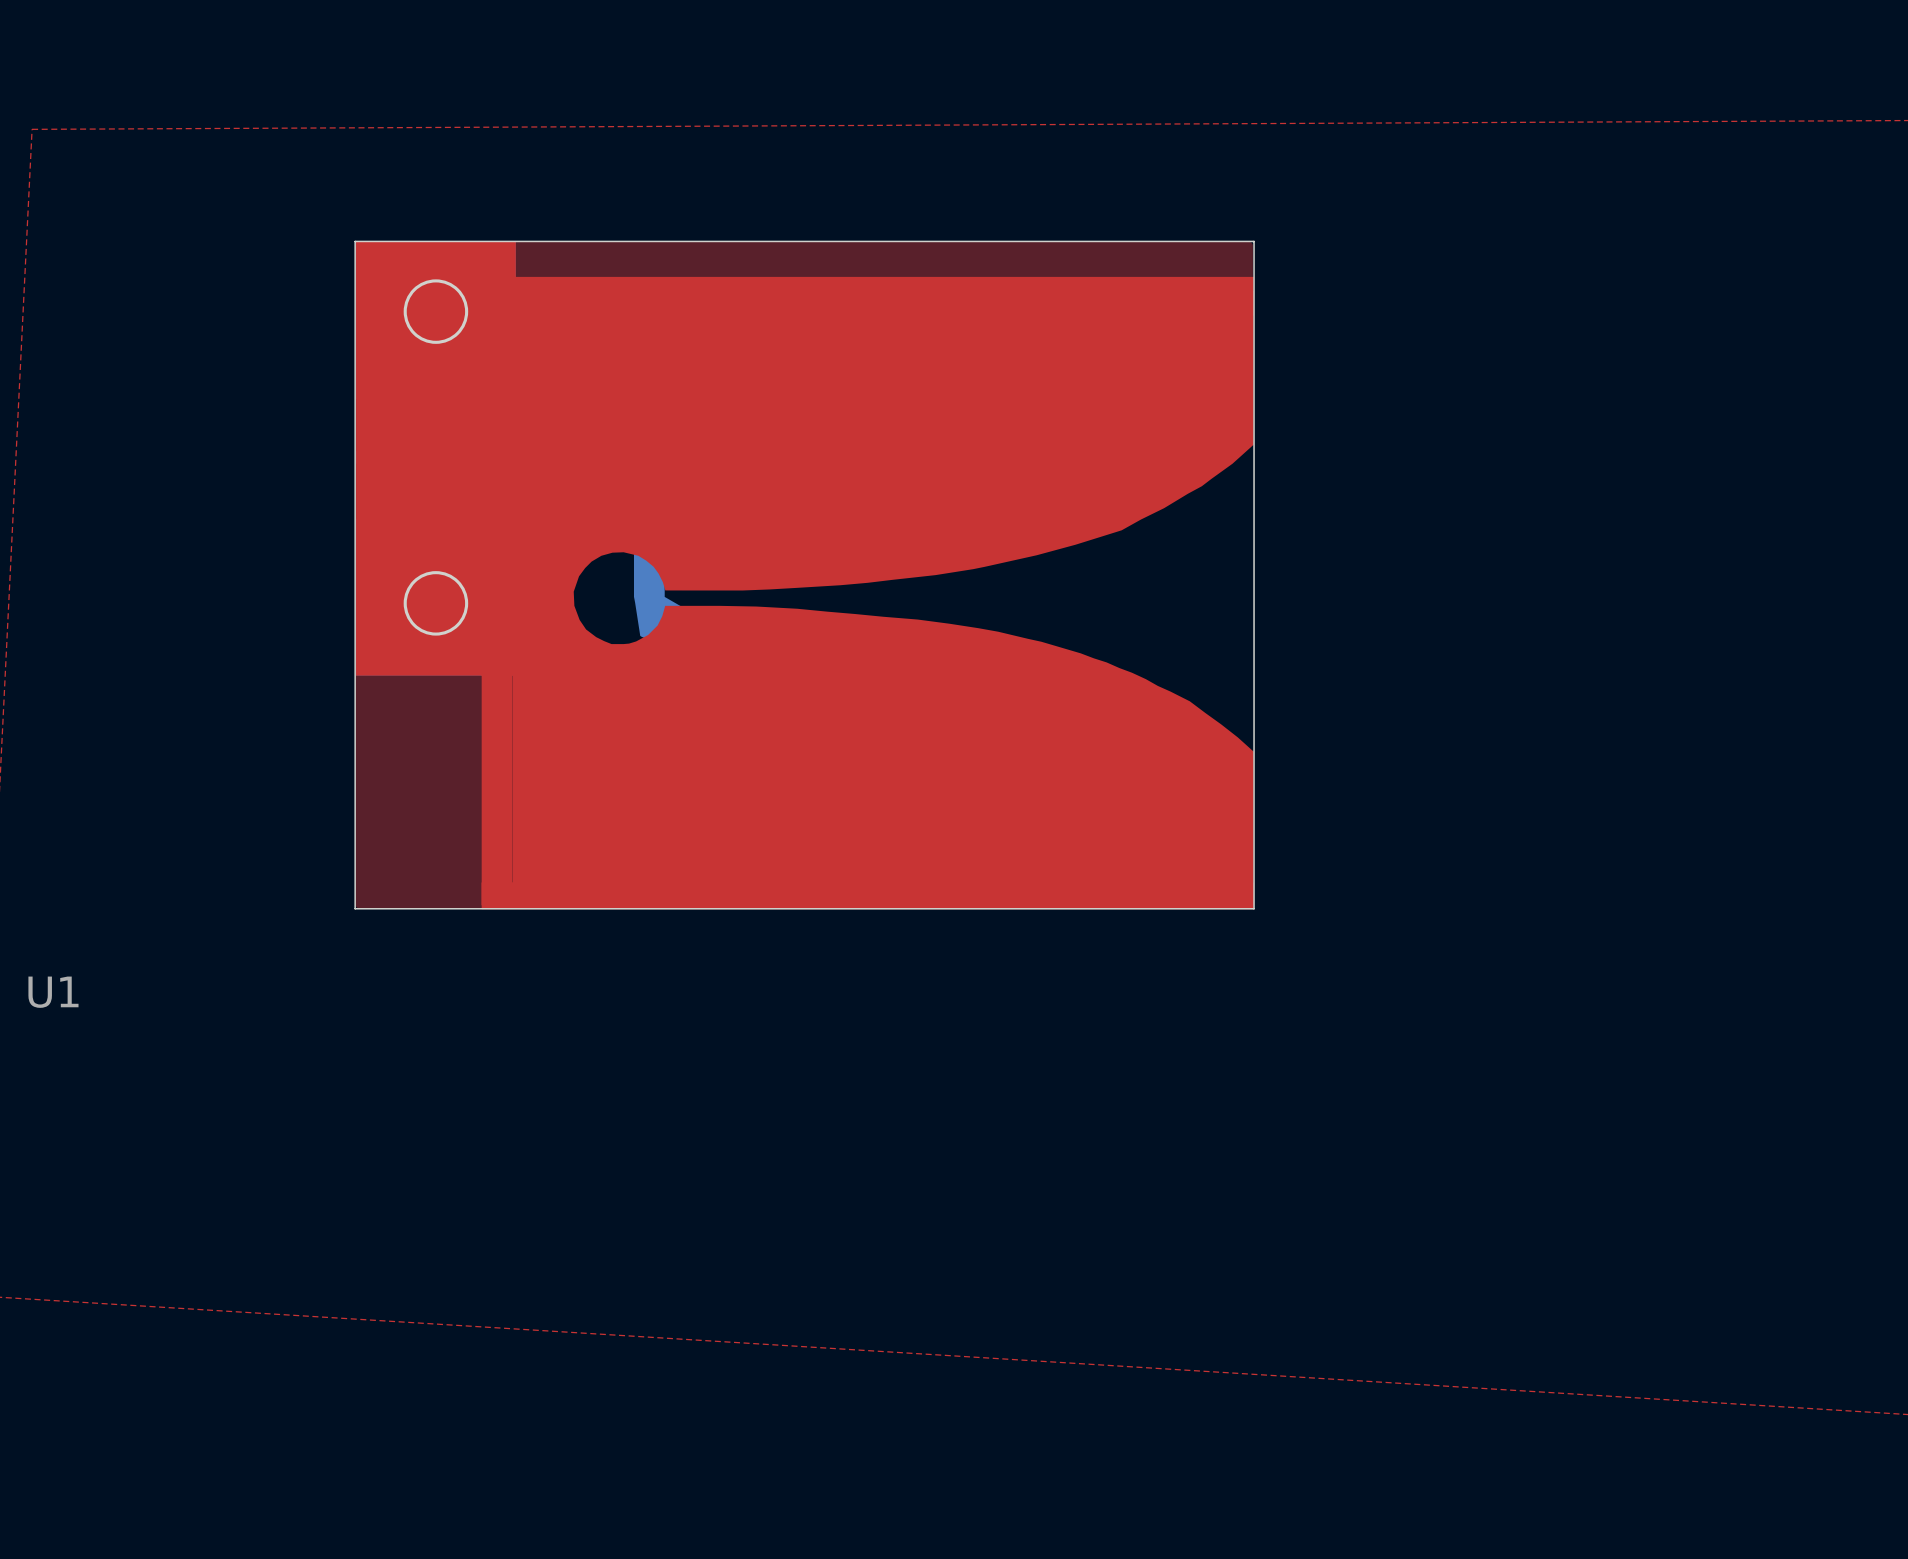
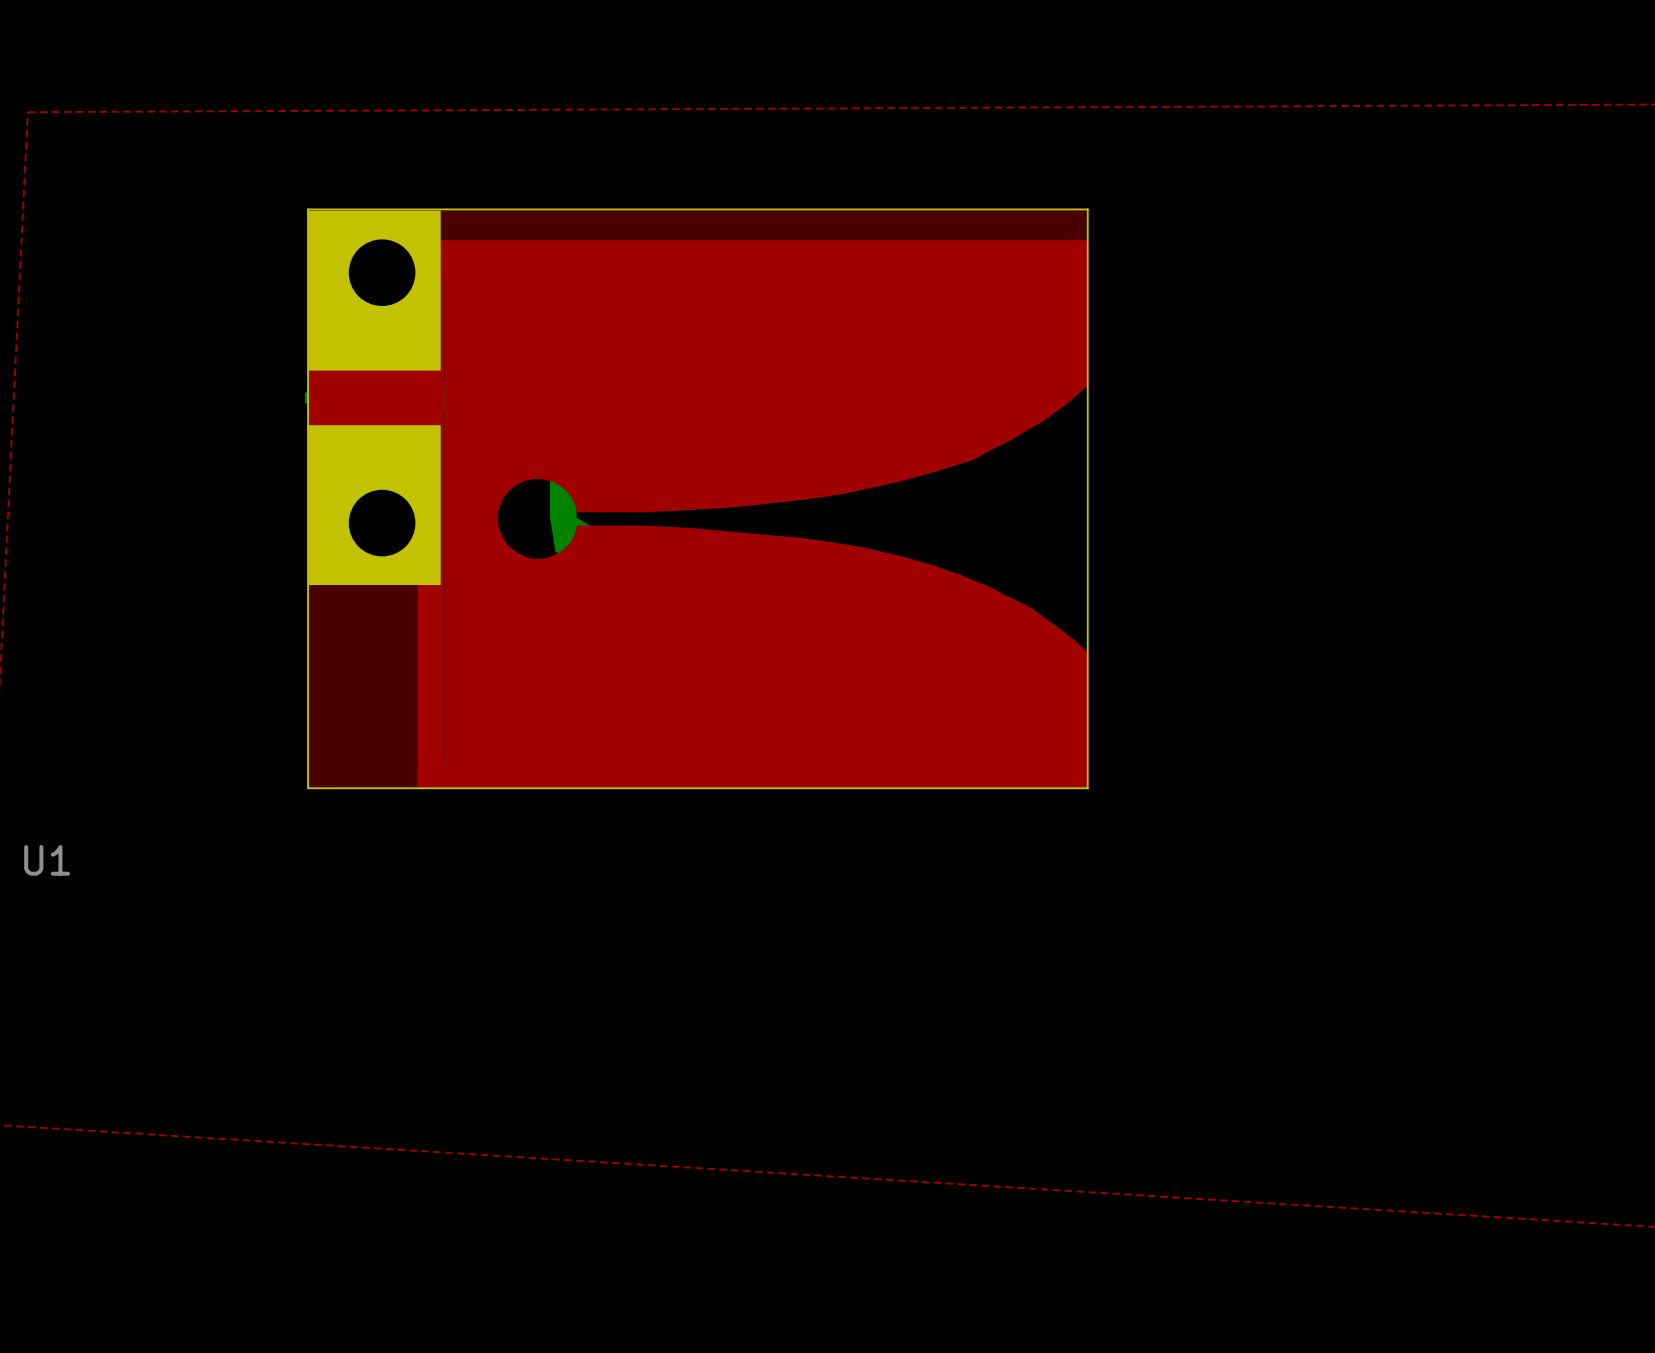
part footprint: [356, 240, 516, 676] -> [304, 210, 444, 586]

